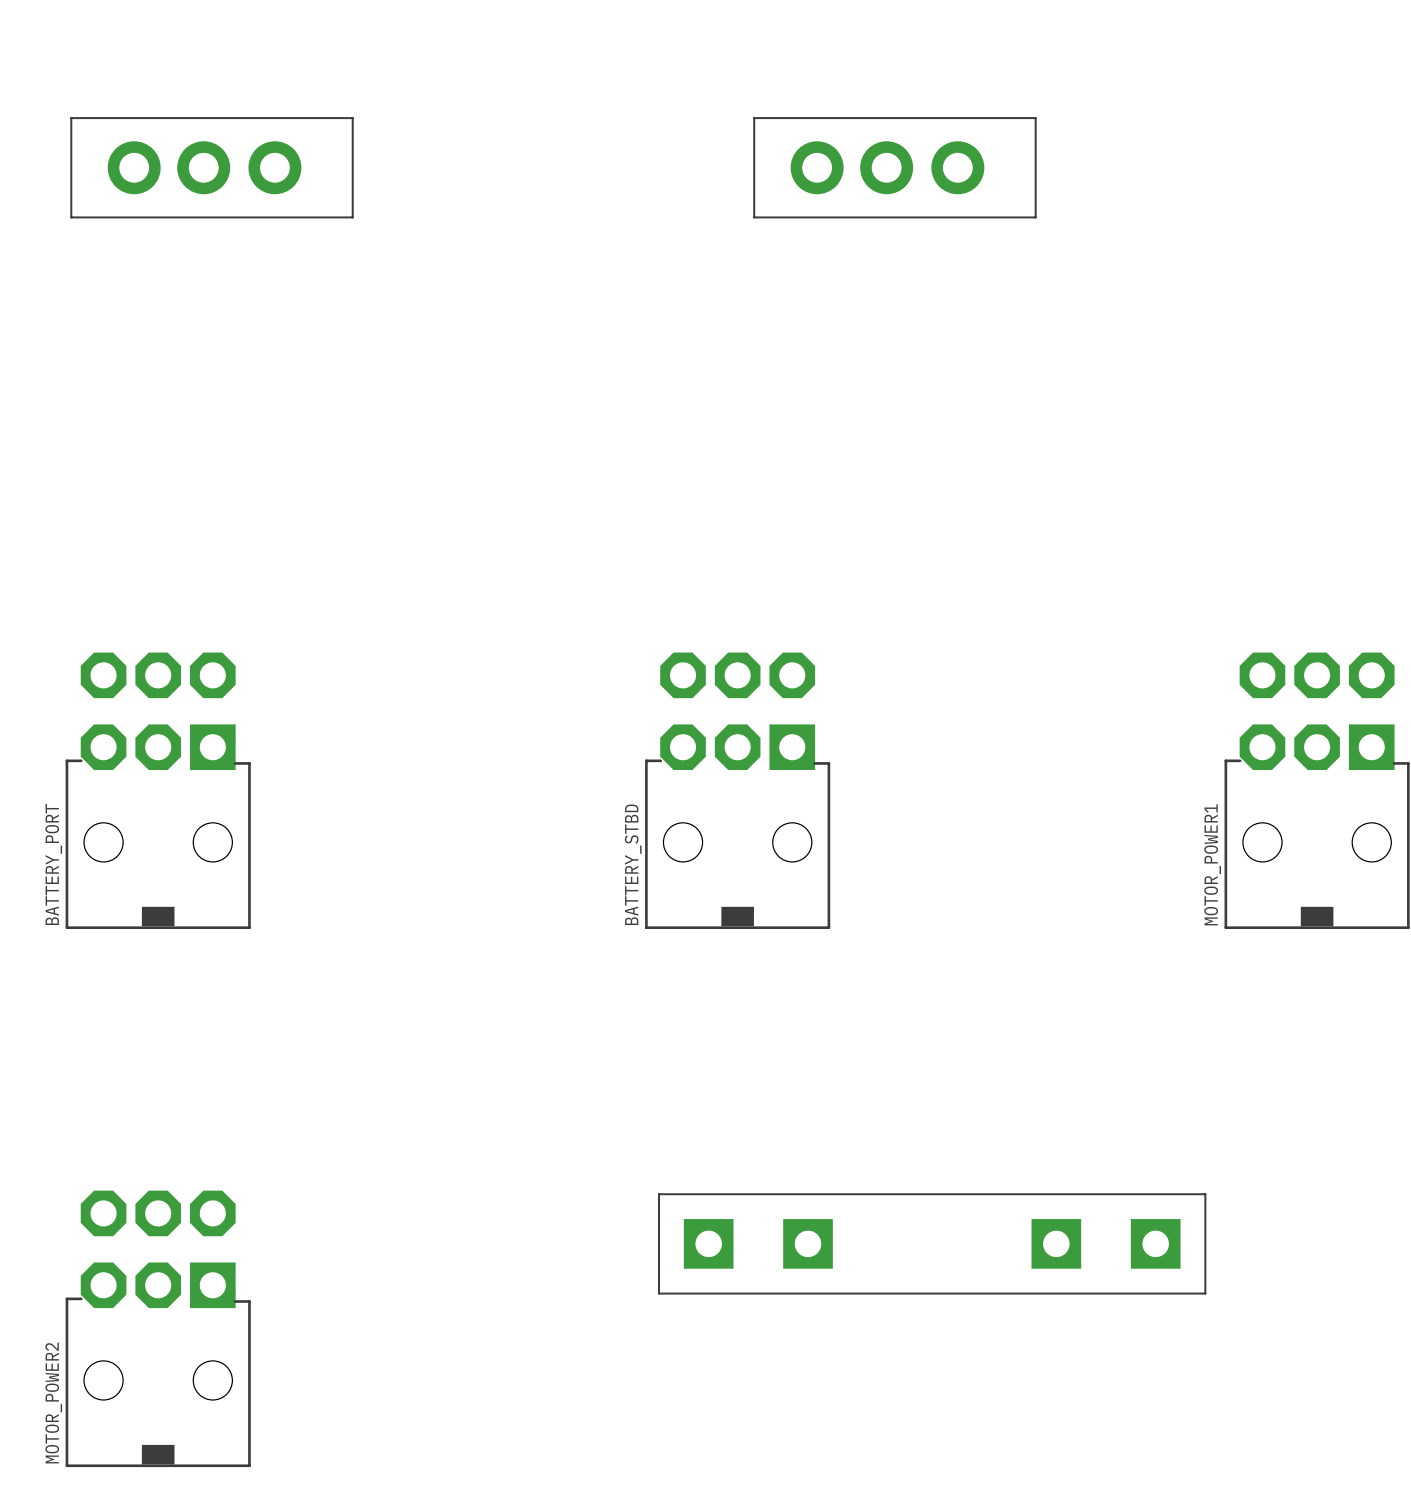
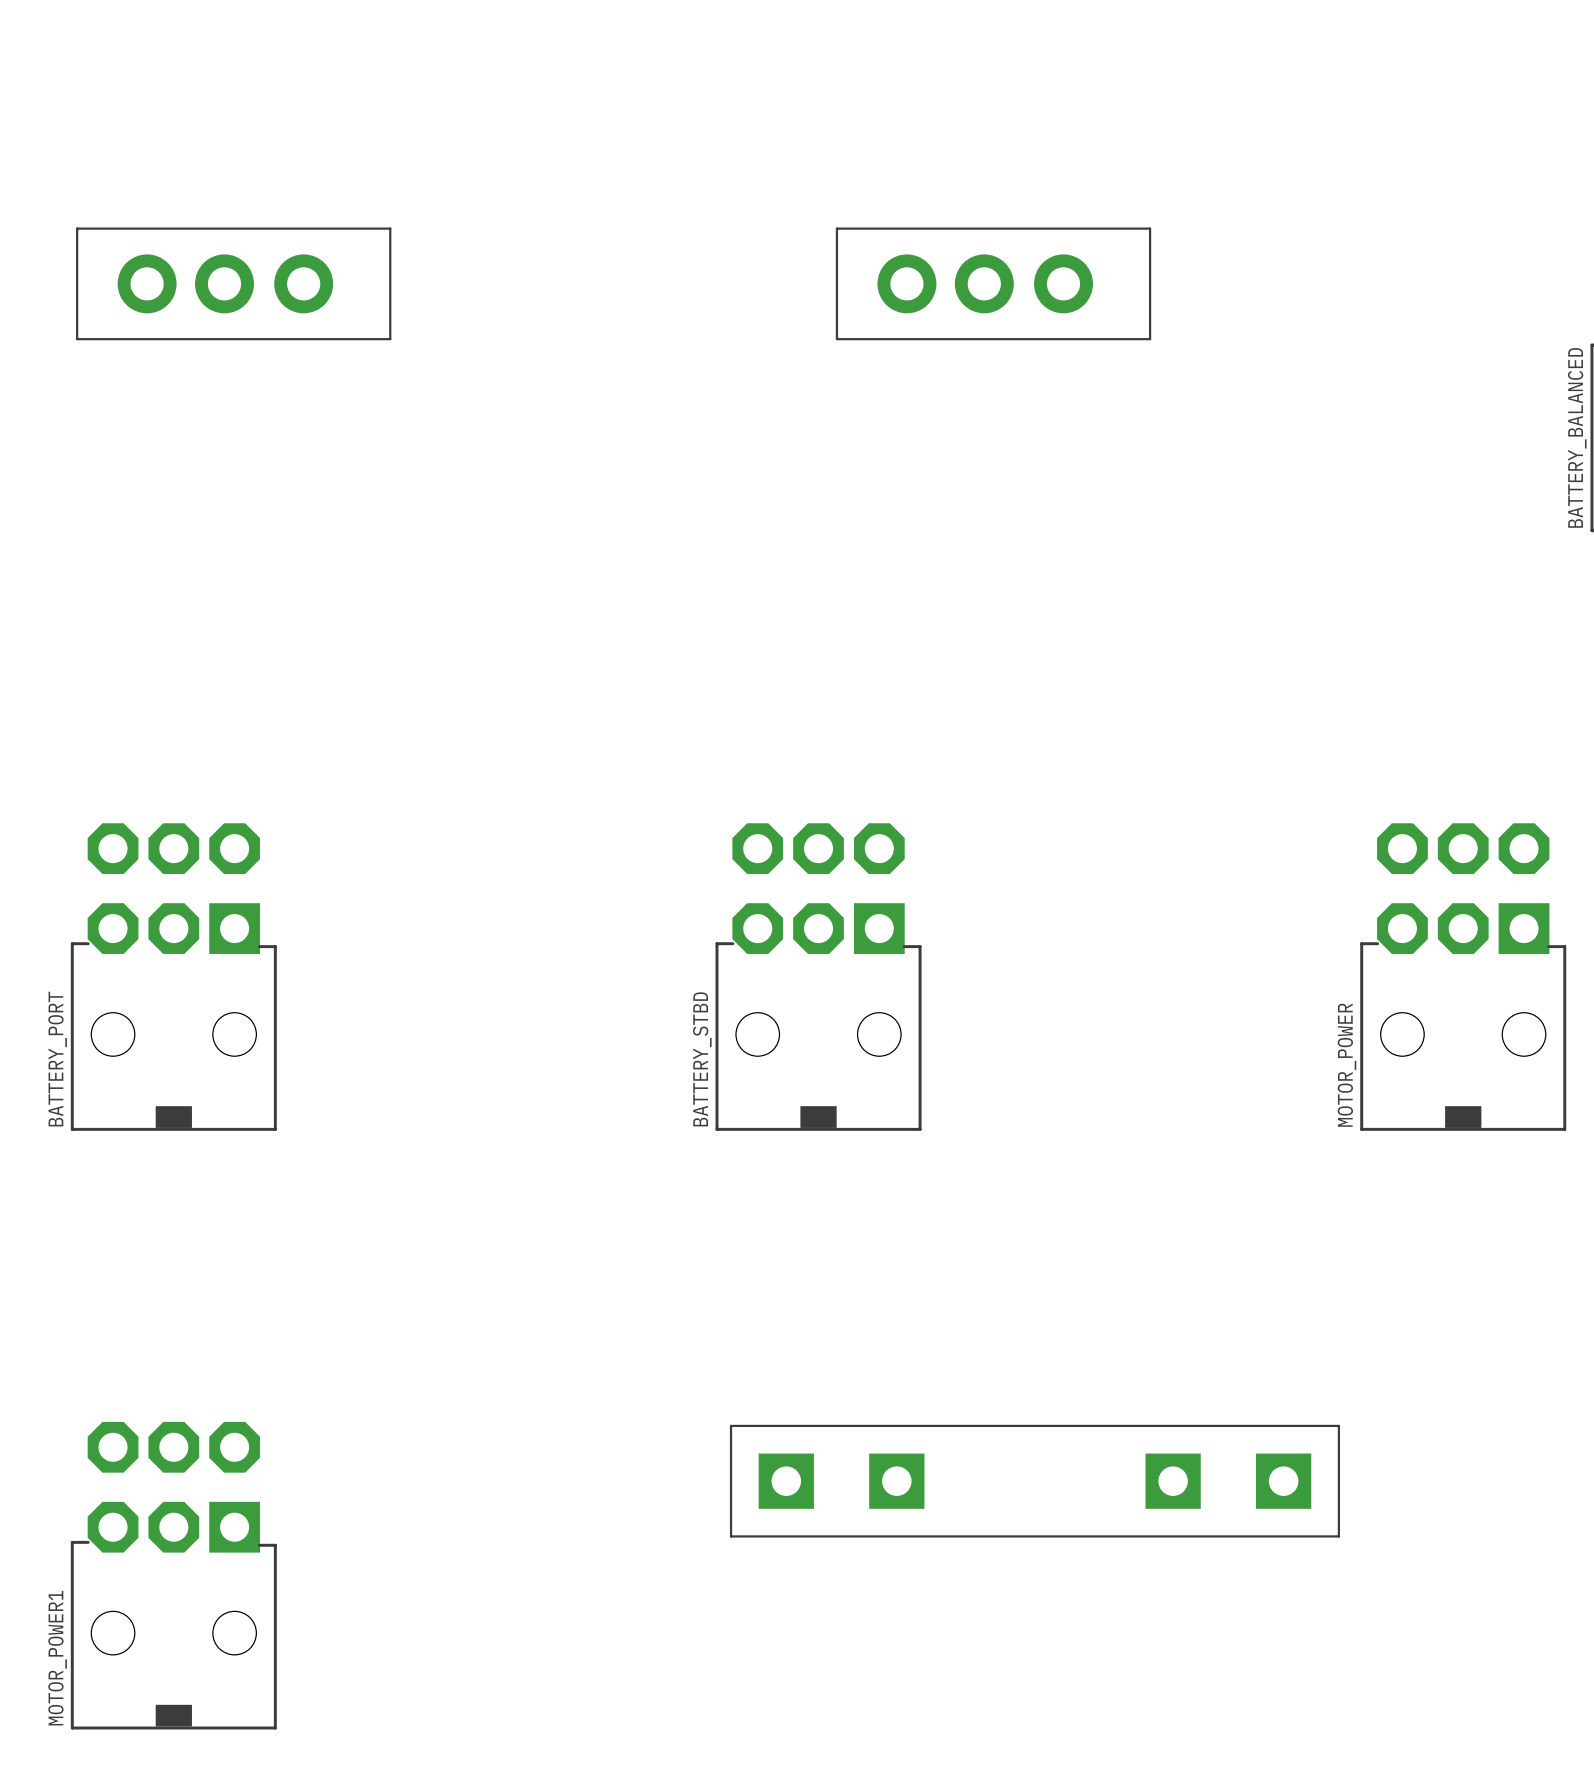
MOTOR_POWER1 name: MOTOR_POWER1 (1212, 864) -> MOTOR_POWER (1347, 1065)
MOTOR_POWER2 name: MOTOR_POWER2 (53, 1403) -> MOTOR_POWER1 (57, 1658)

